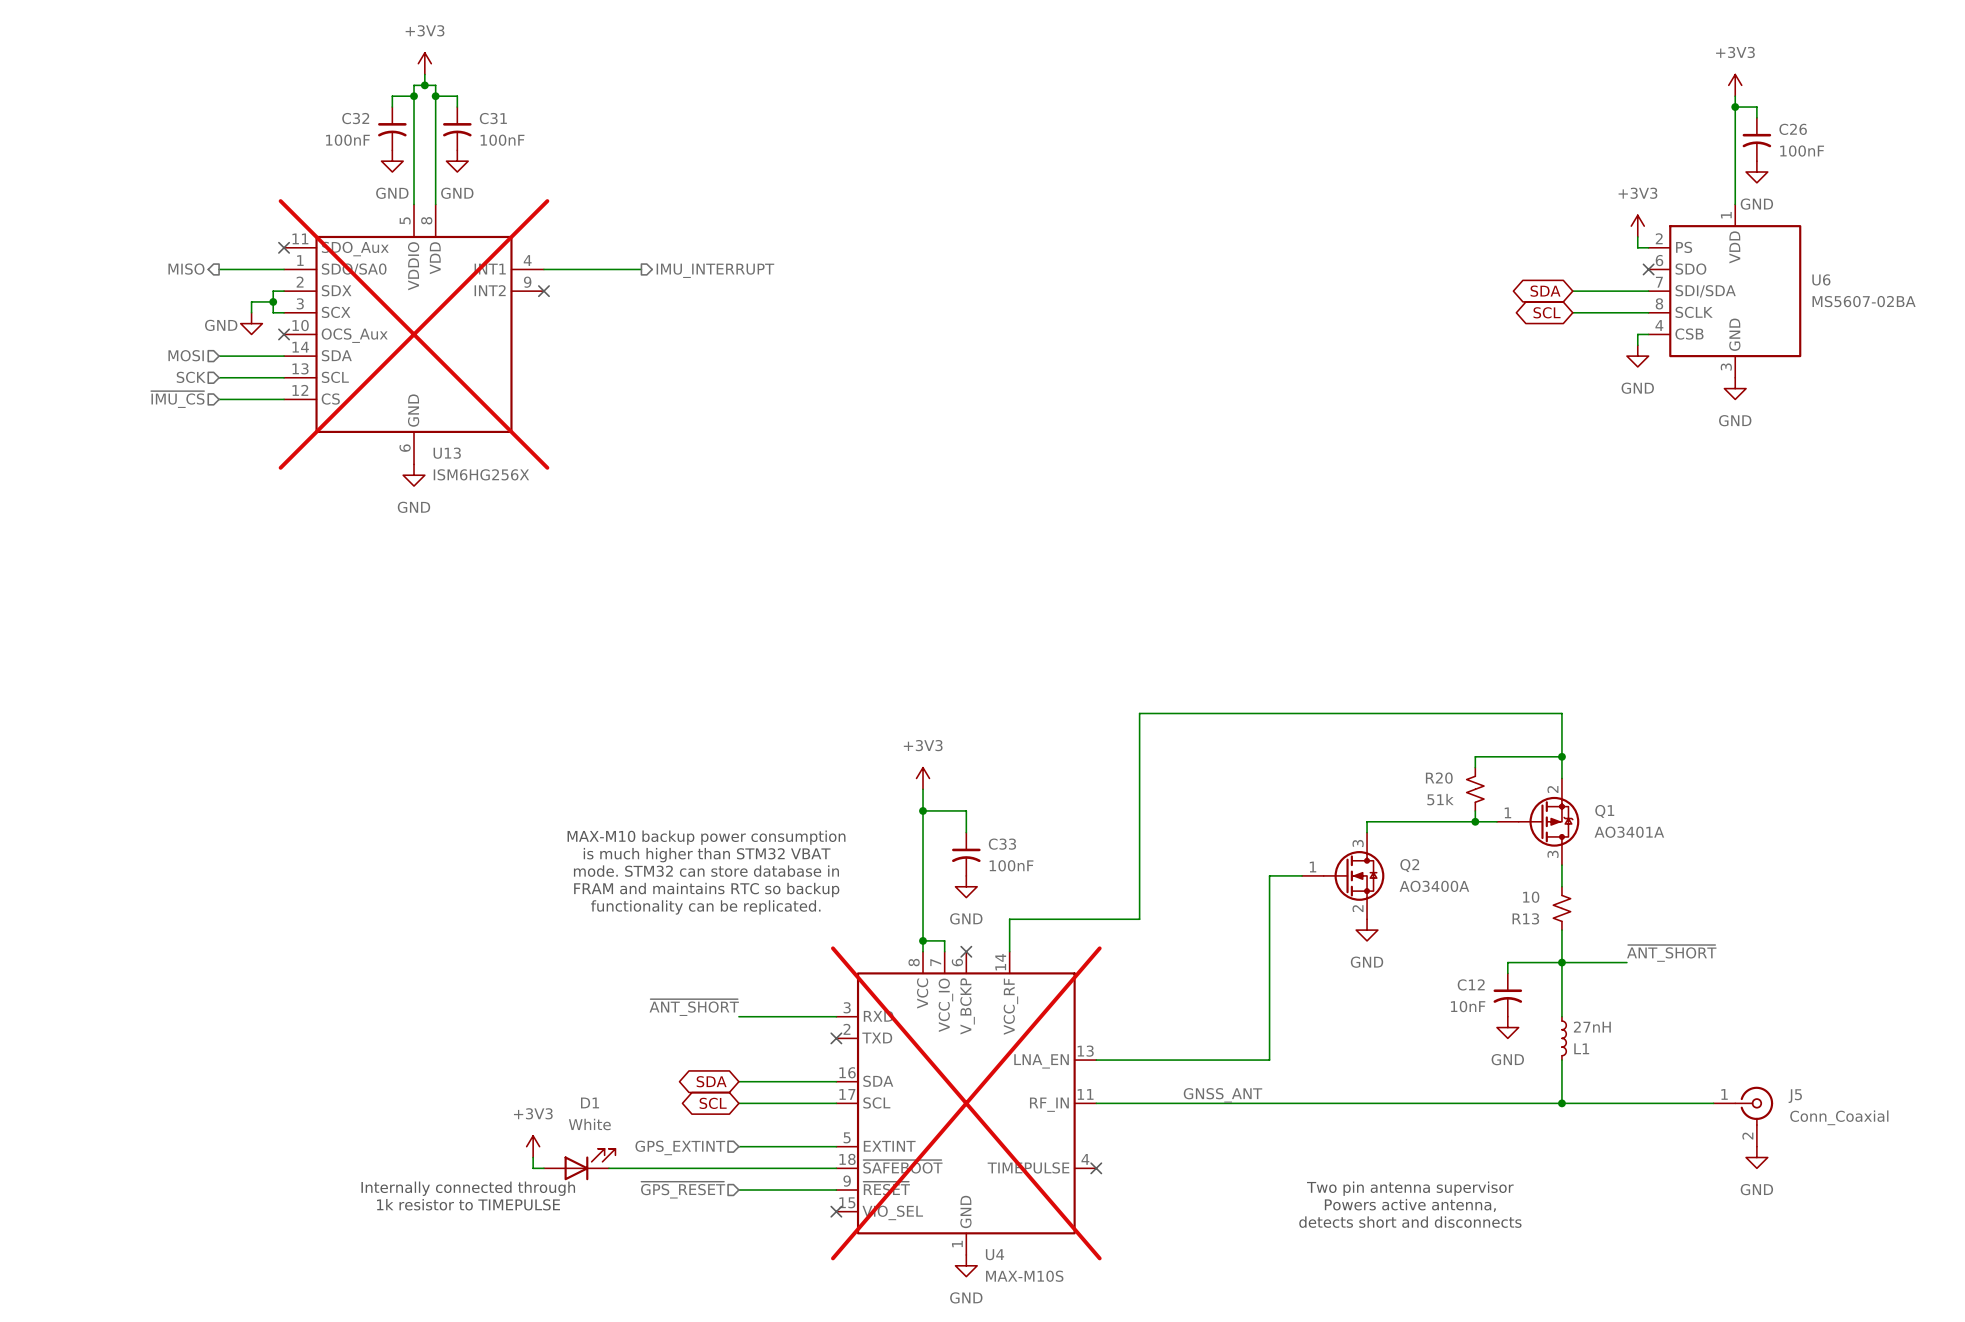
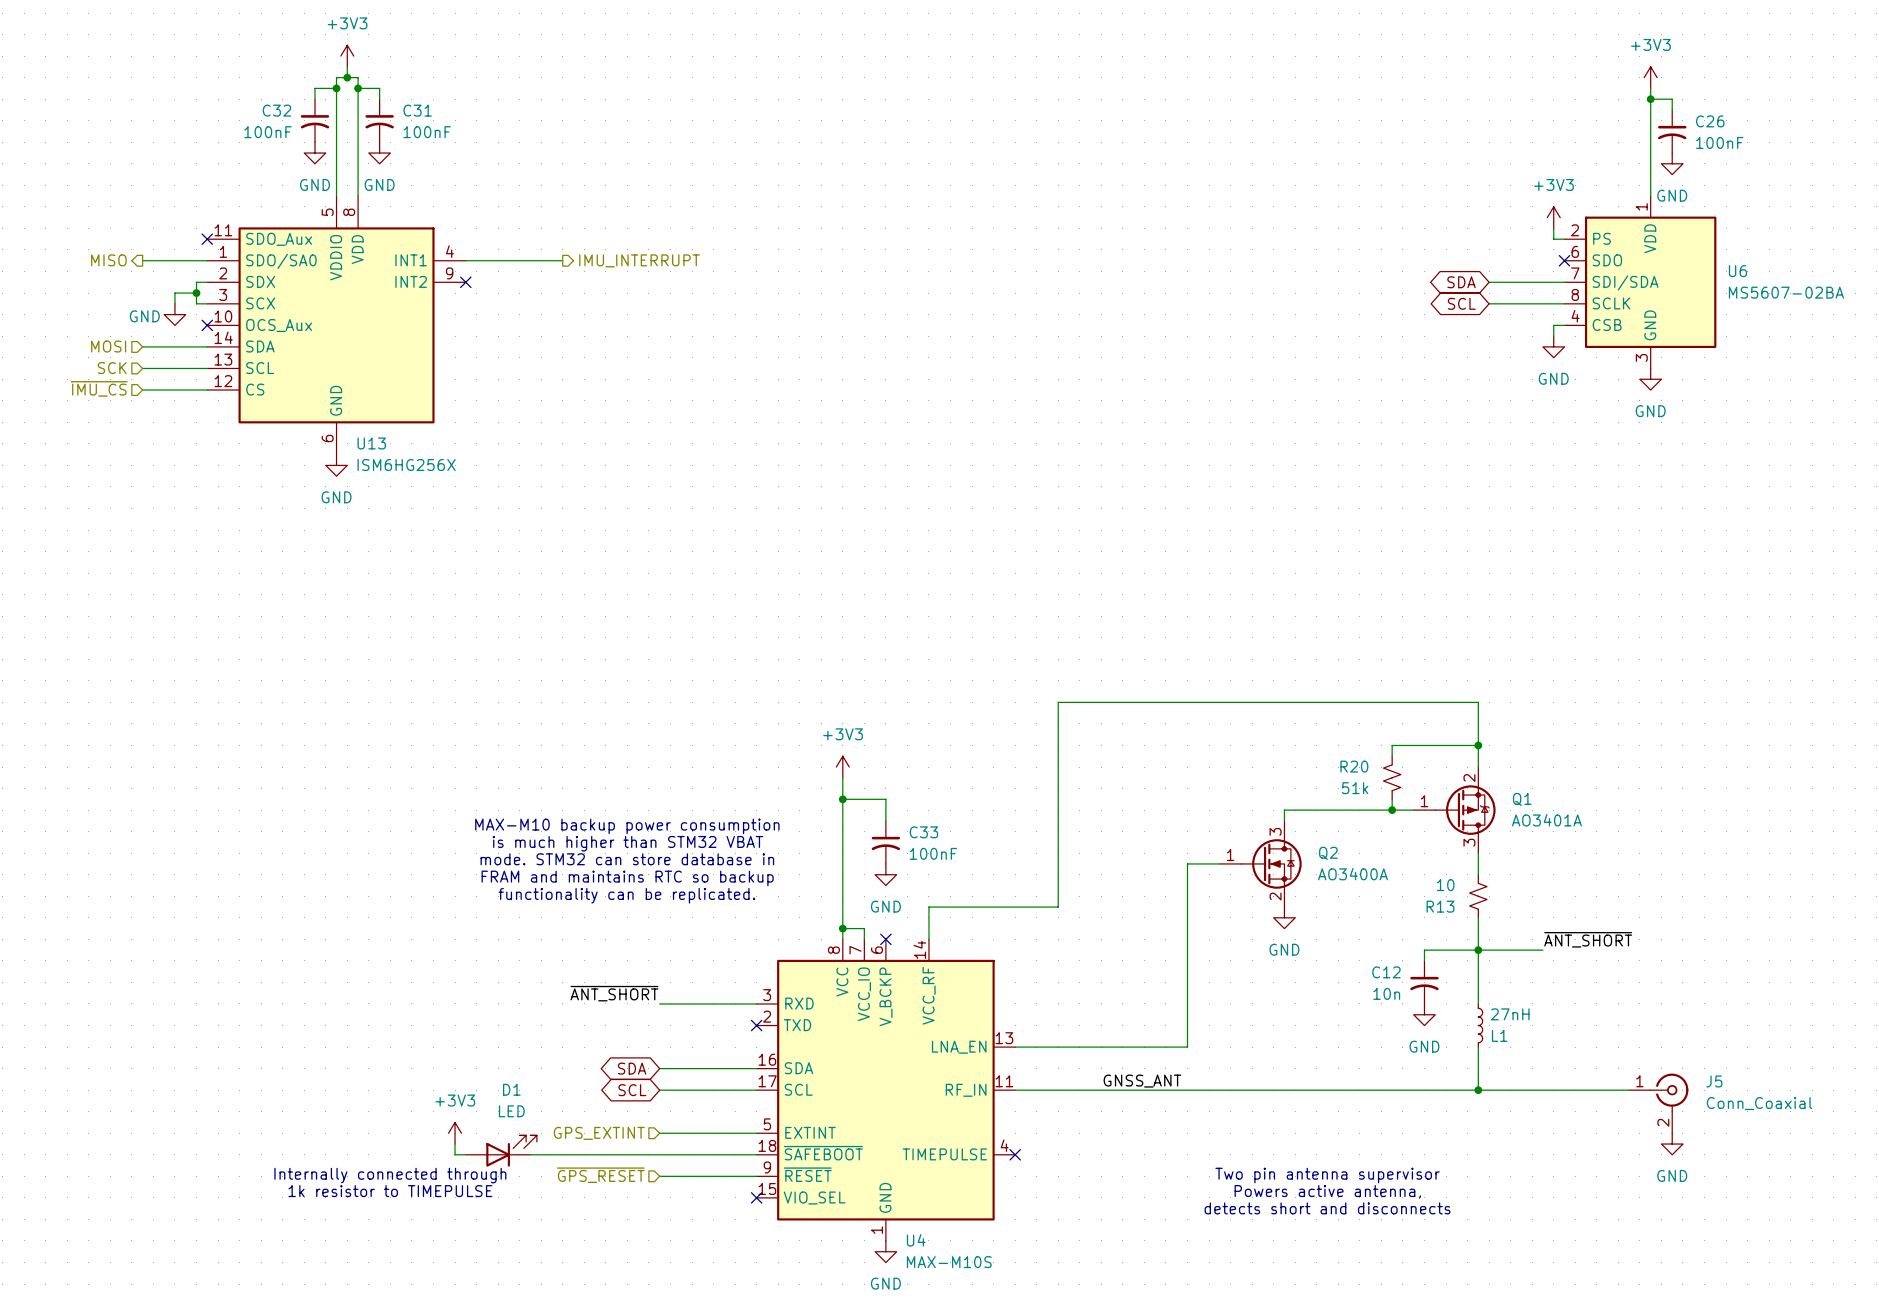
U13 do-not-place cross: (414, 334) -> none
C12 value: 10nF (1468, 1006) -> 10n (1386, 993)
U4 do-not-place cross: (966, 1103) -> none
D1 value: White (589, 1124) -> LED (511, 1111)

